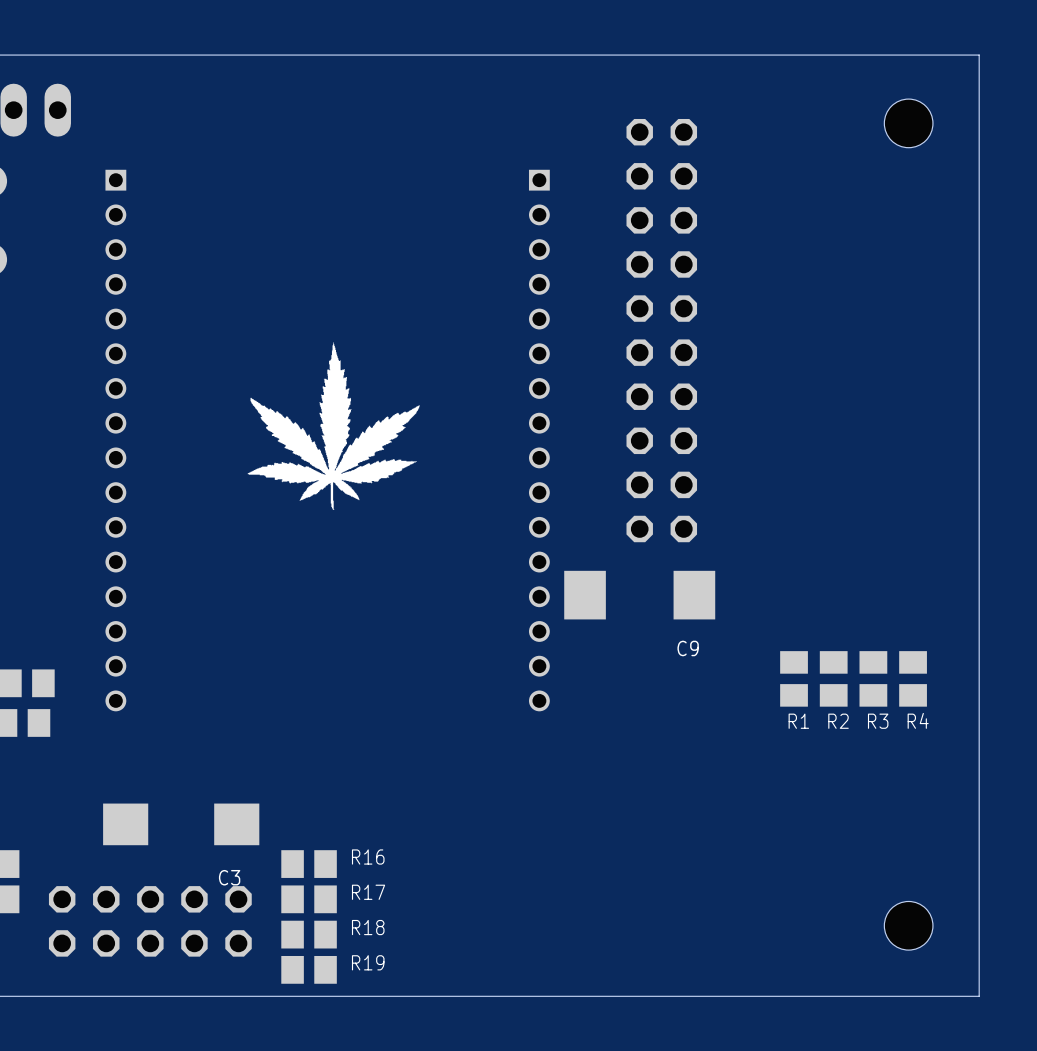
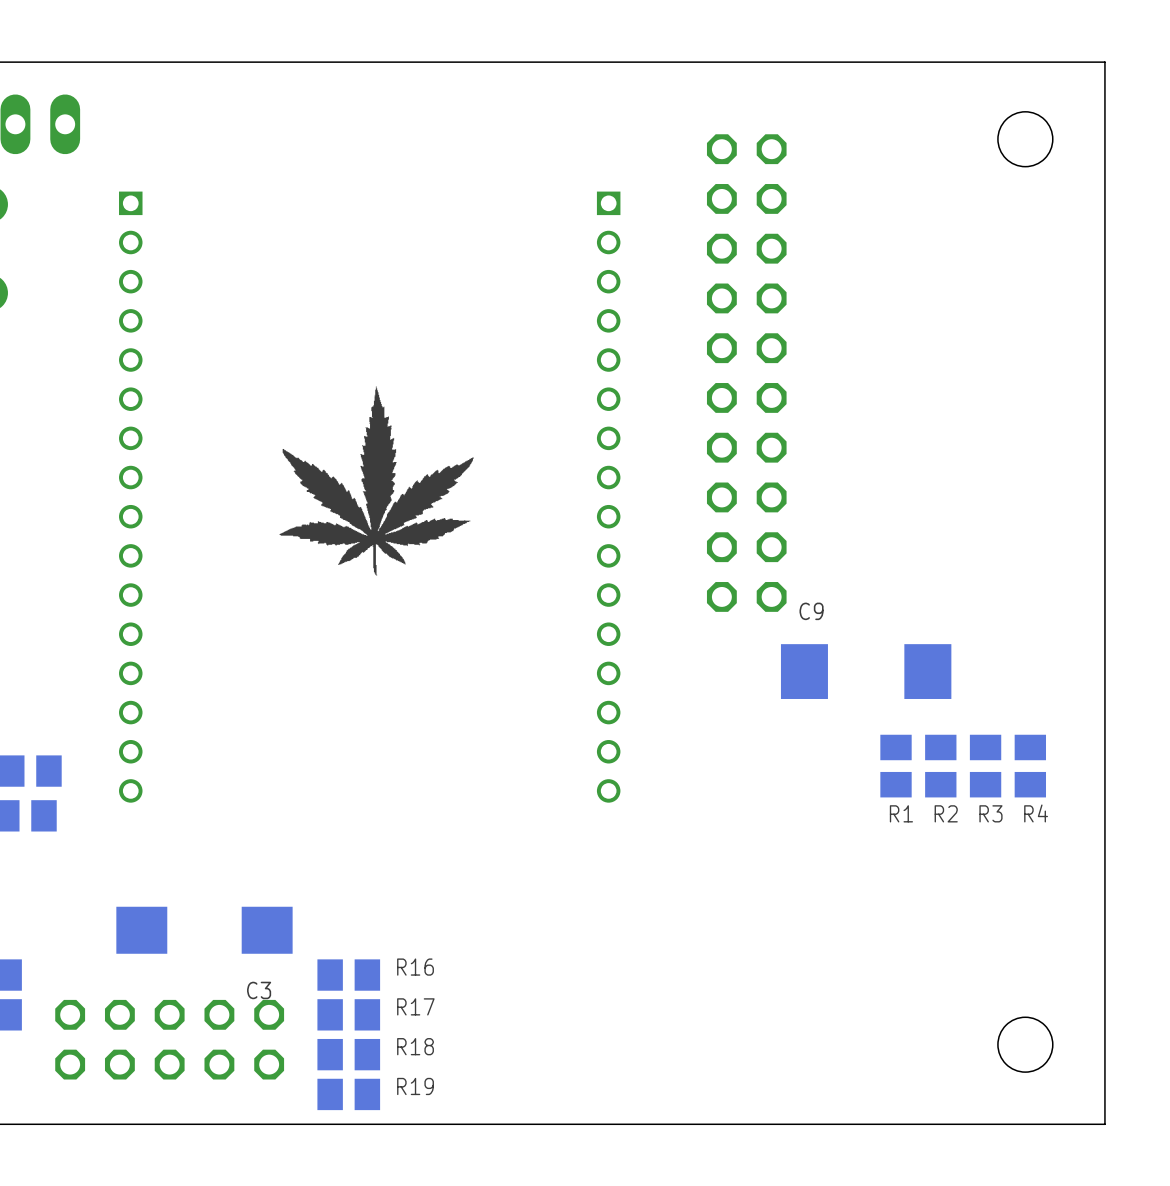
C9 position: (639, 595) -> (866, 671)
C9 name position: C9 (688, 648) -> C9 (811, 611)

